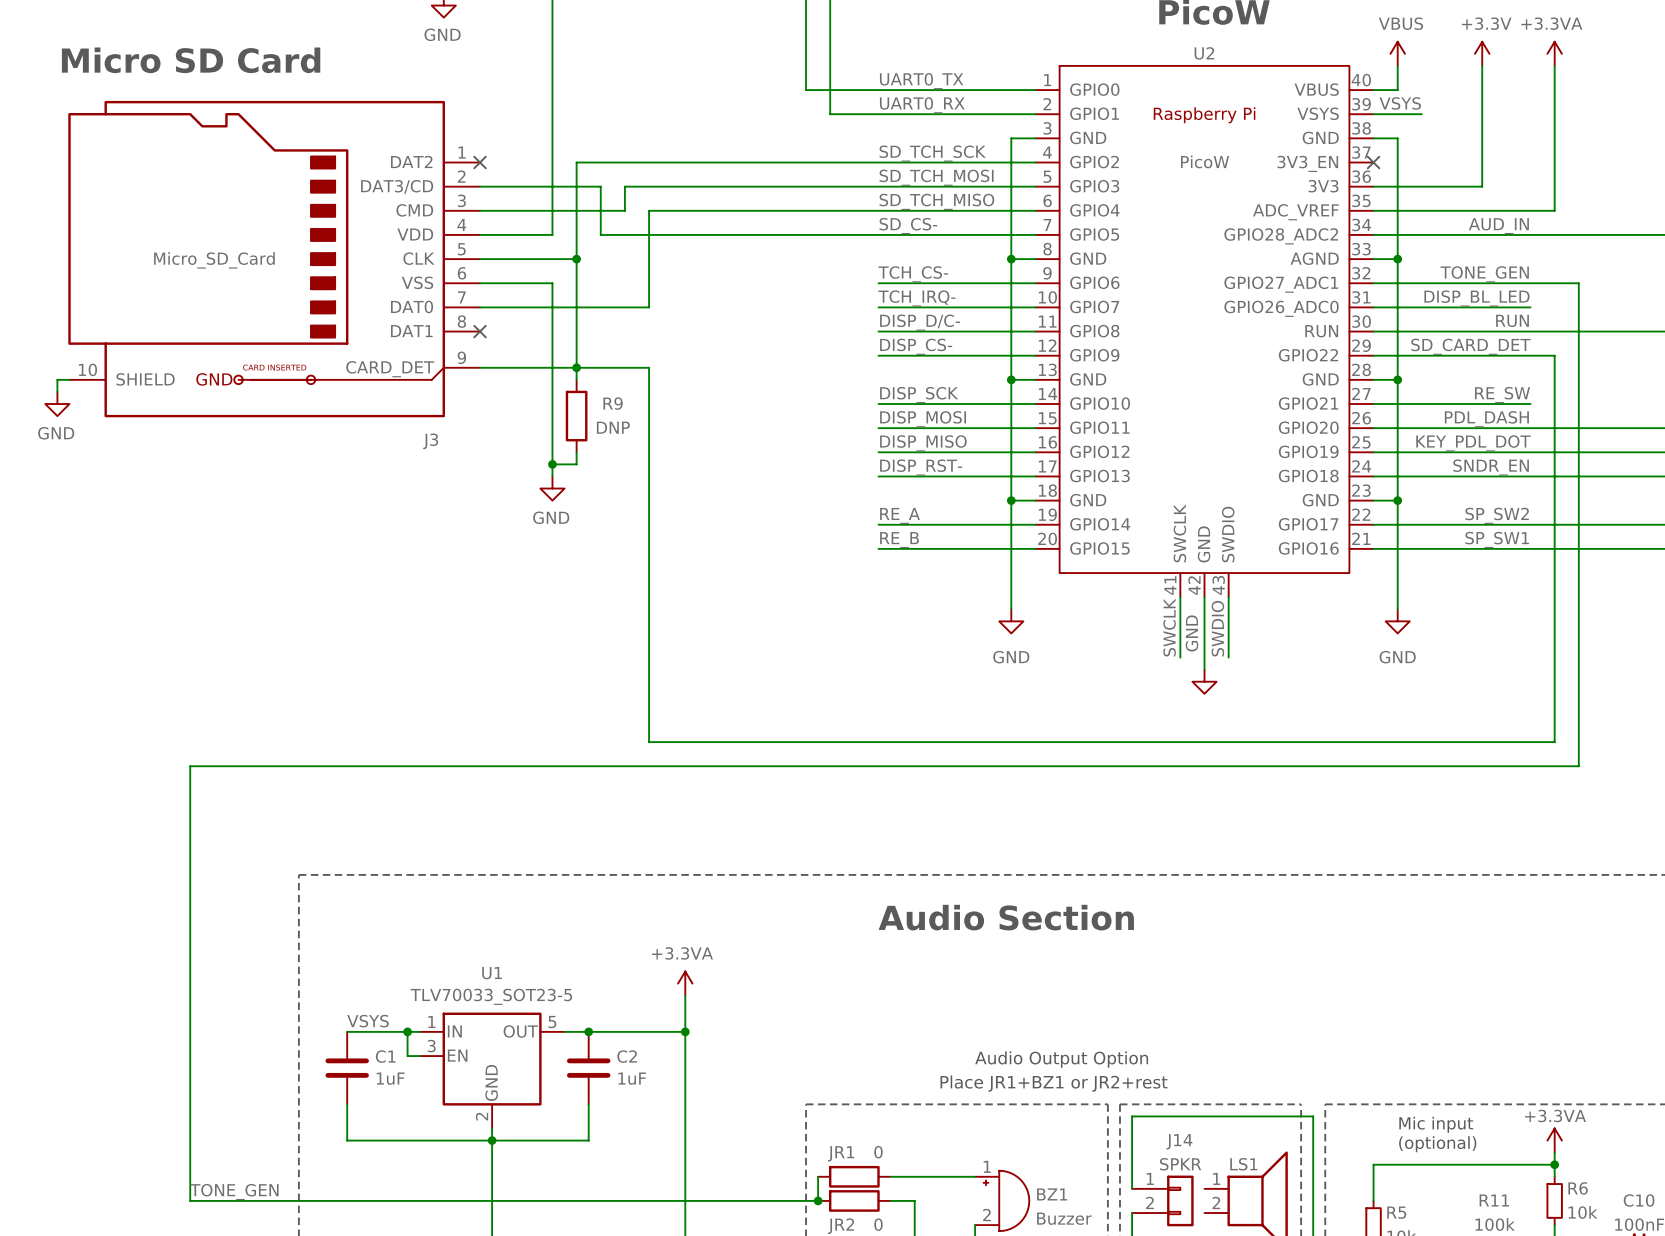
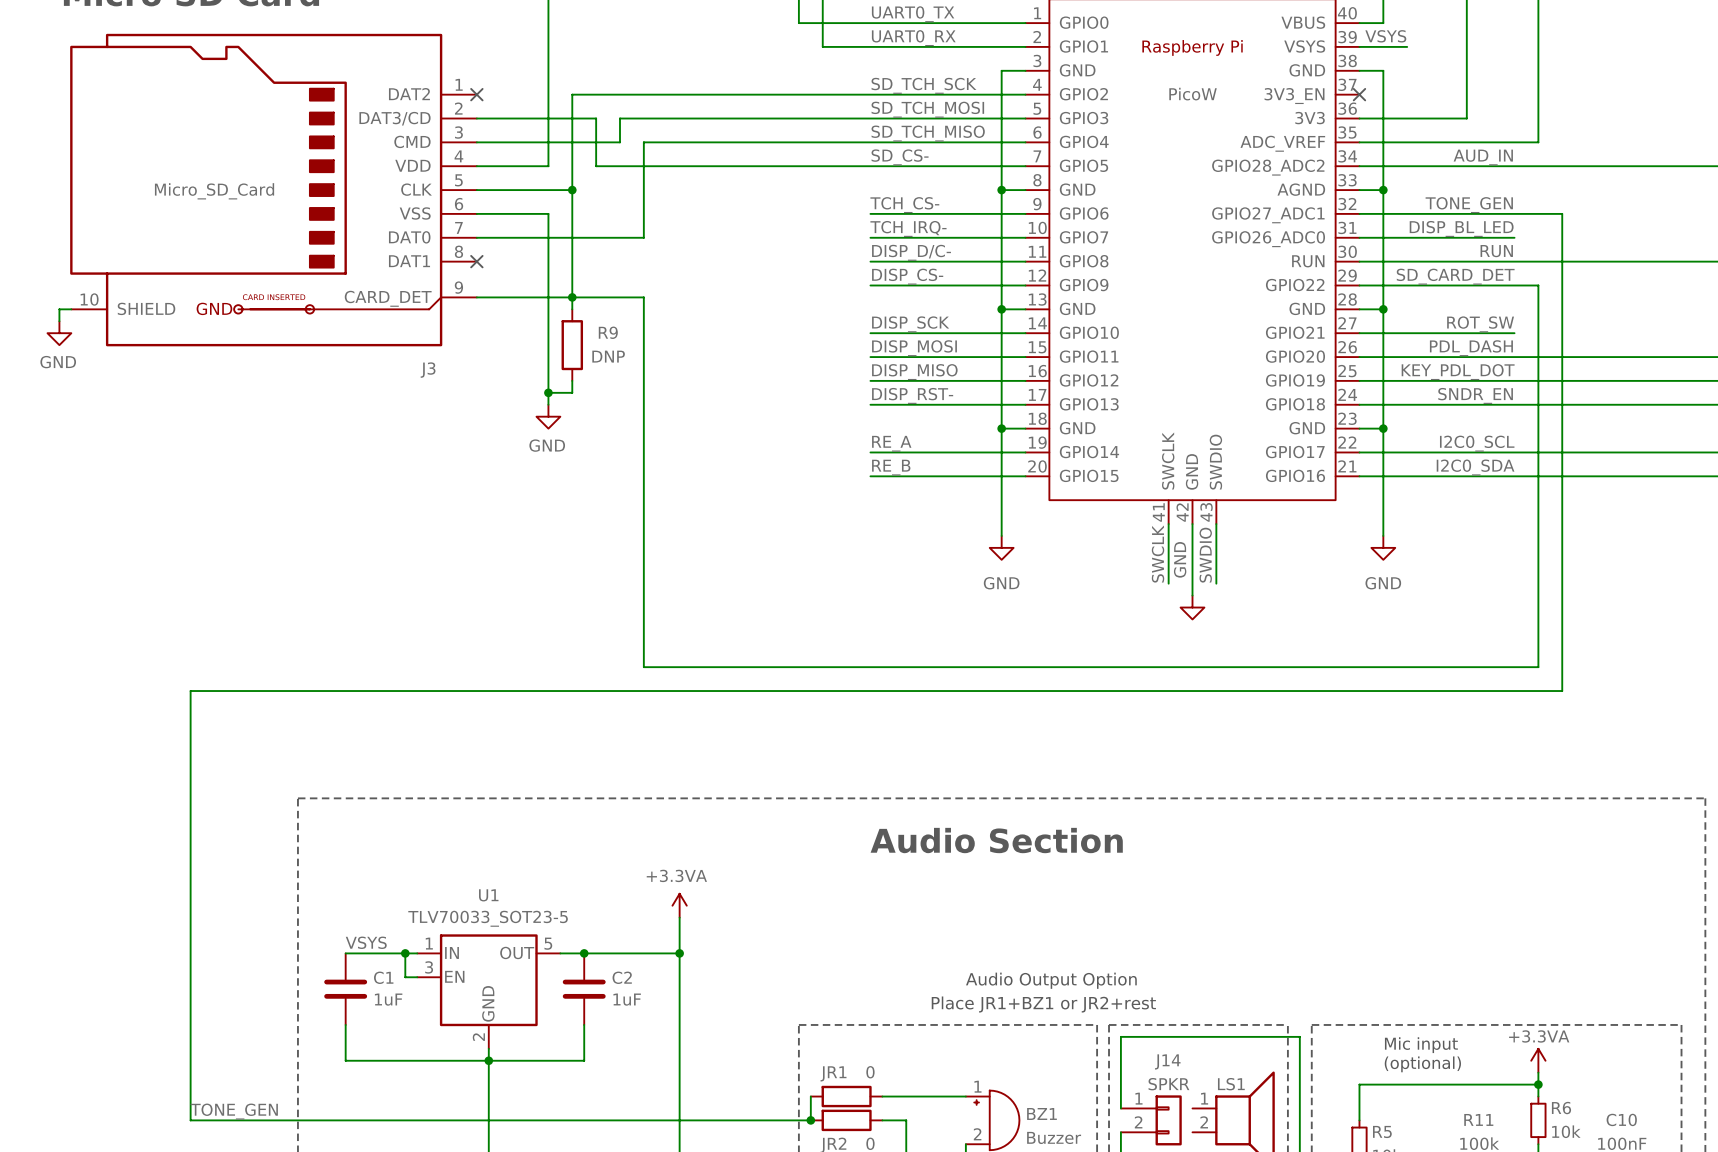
label: RE_SW (1502, 395) -> ROT_SW (1480, 324)
label: SP_SW2 (1497, 515) -> I2C0_SCL (1477, 443)
label: SP_SW1 (1497, 539) -> I2C0_SDA (1475, 467)

